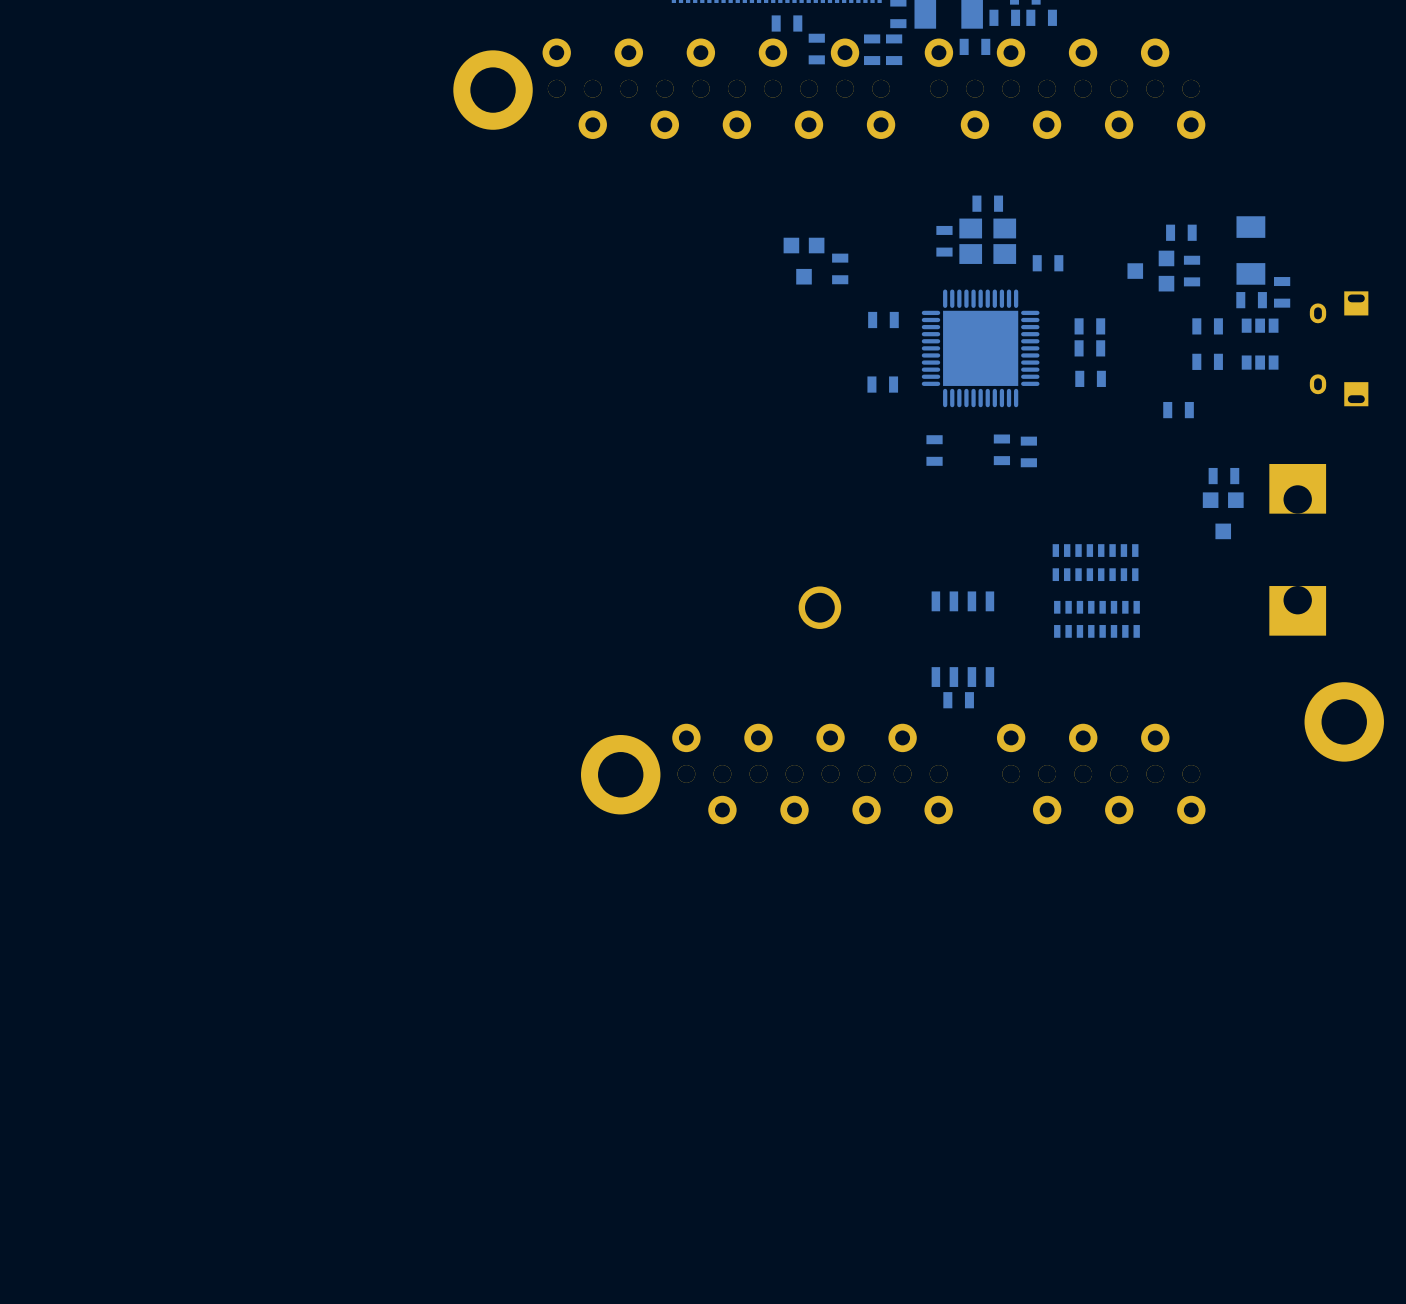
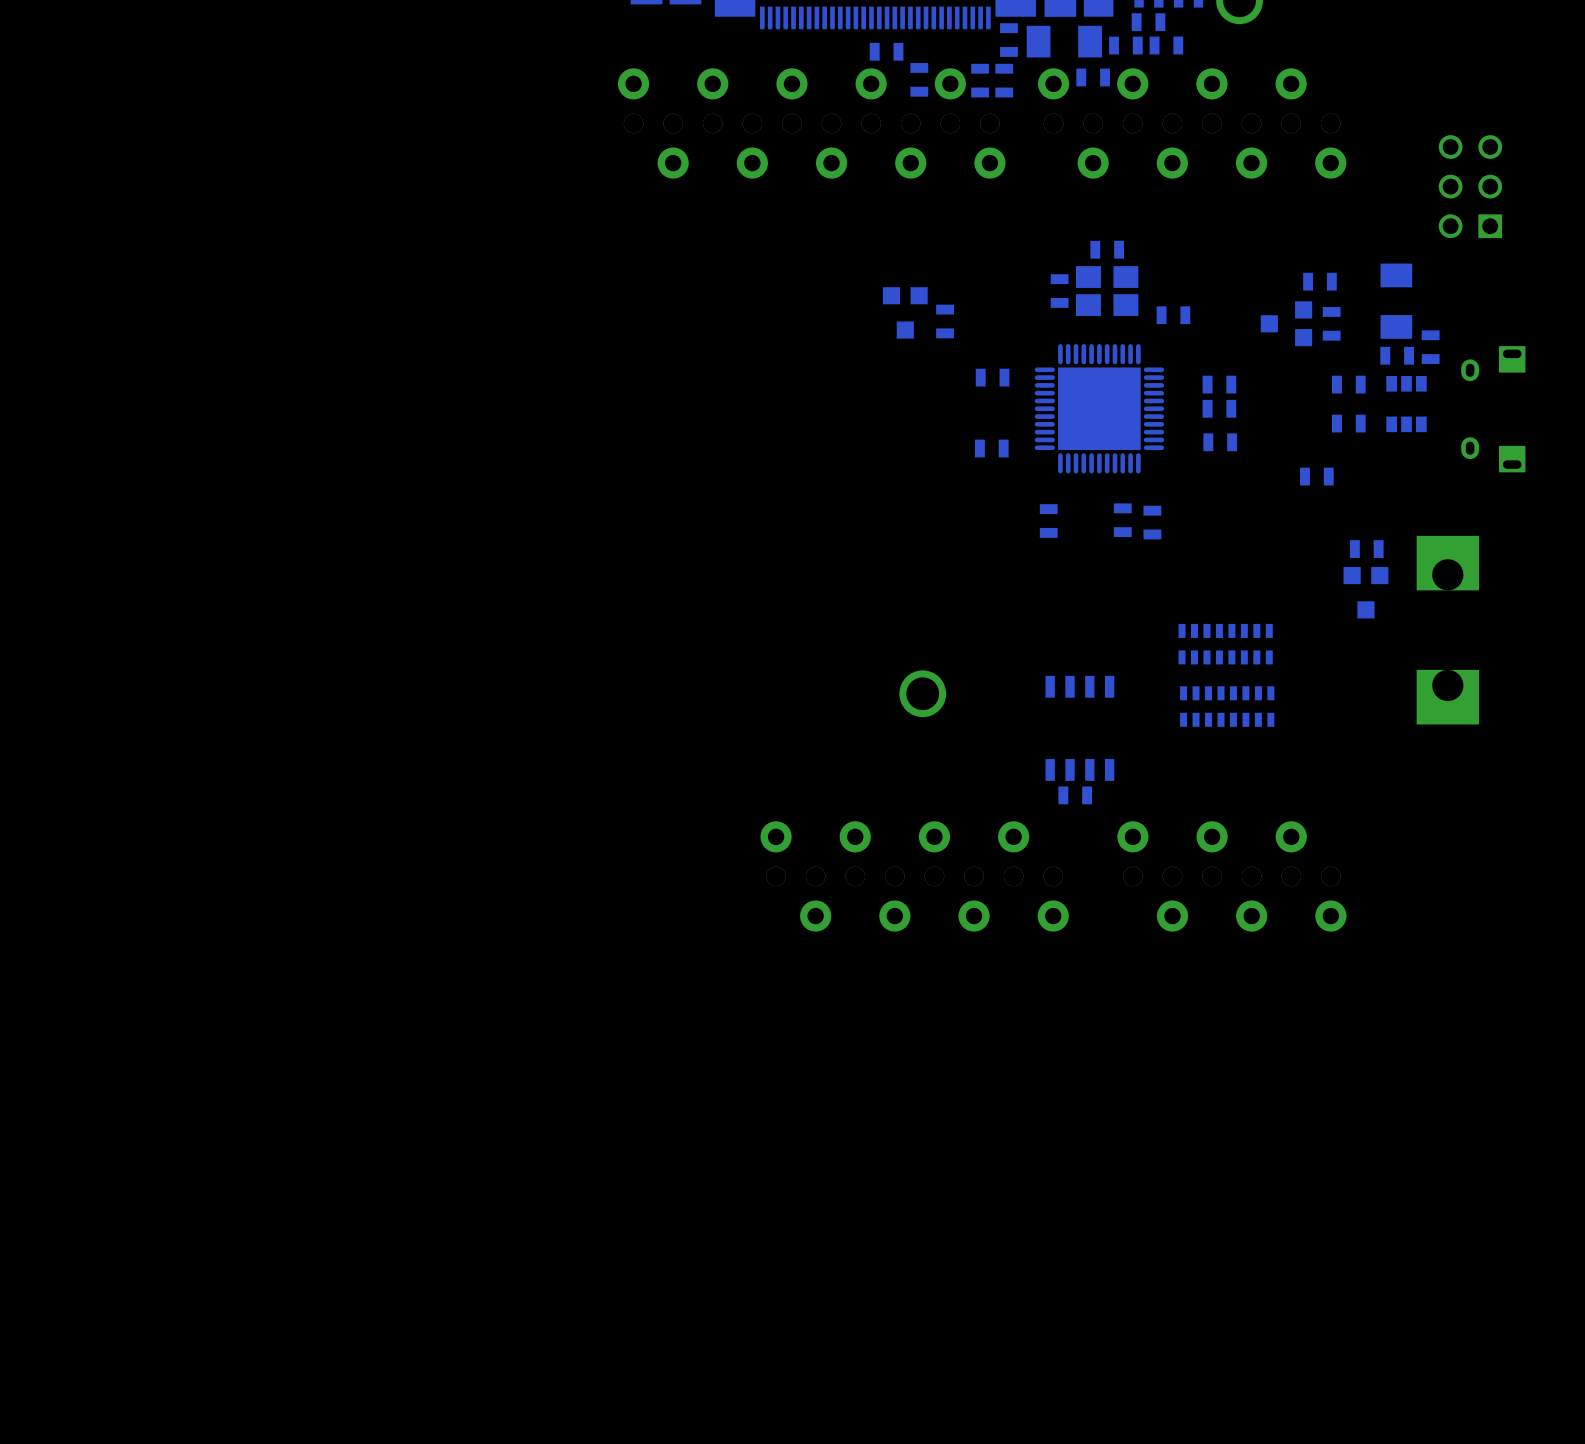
part: (493, 90) -> none
part: none -> (1470, 186)
part: (1344, 721) -> none
part: (620, 774) -> none

